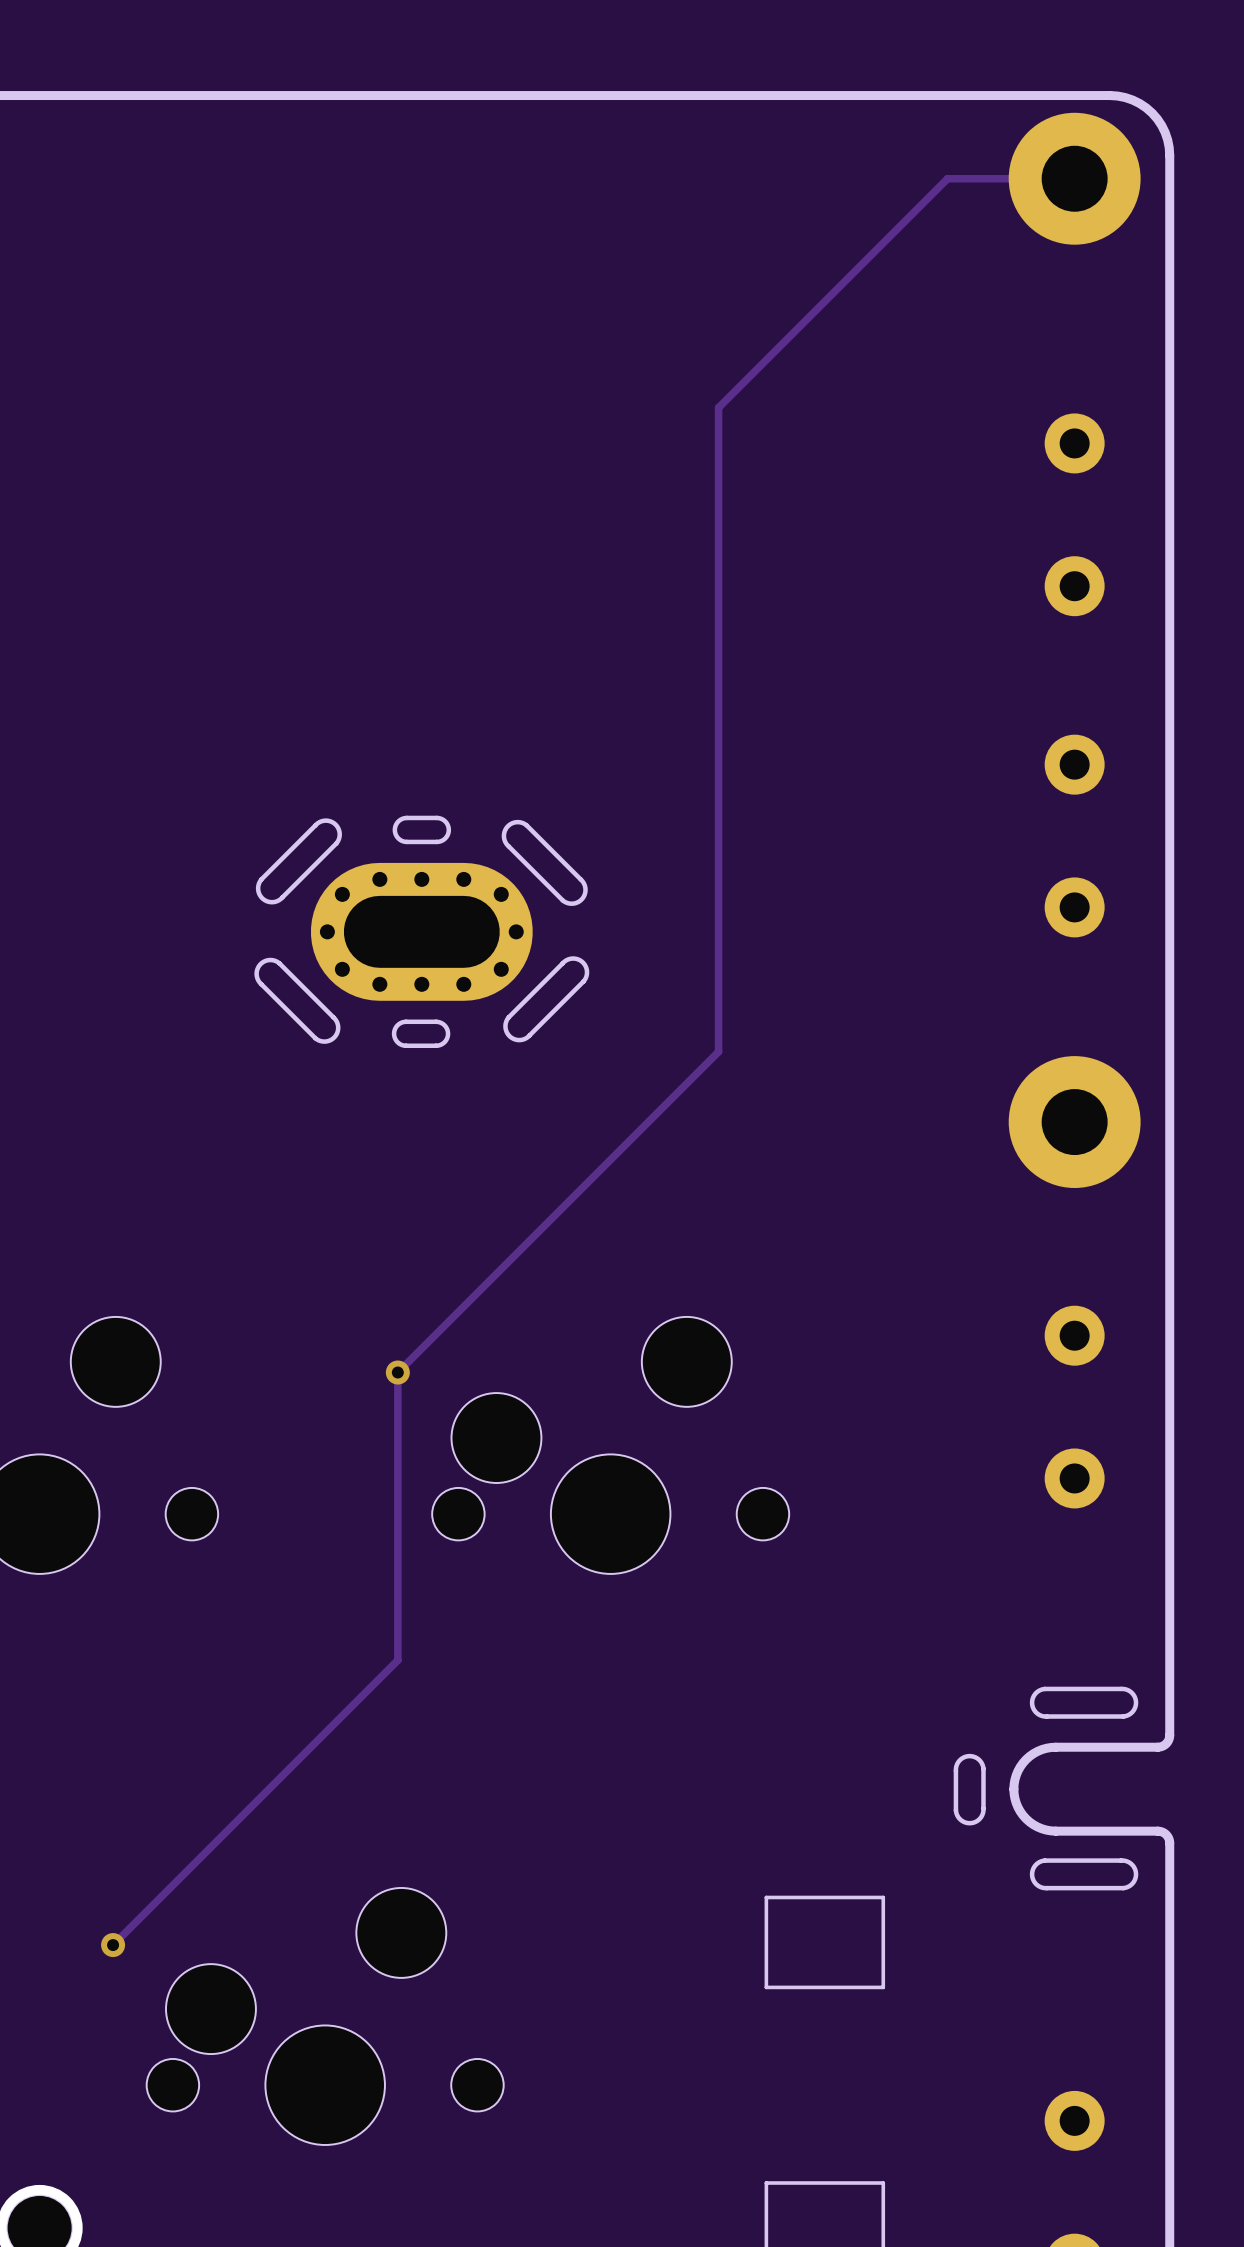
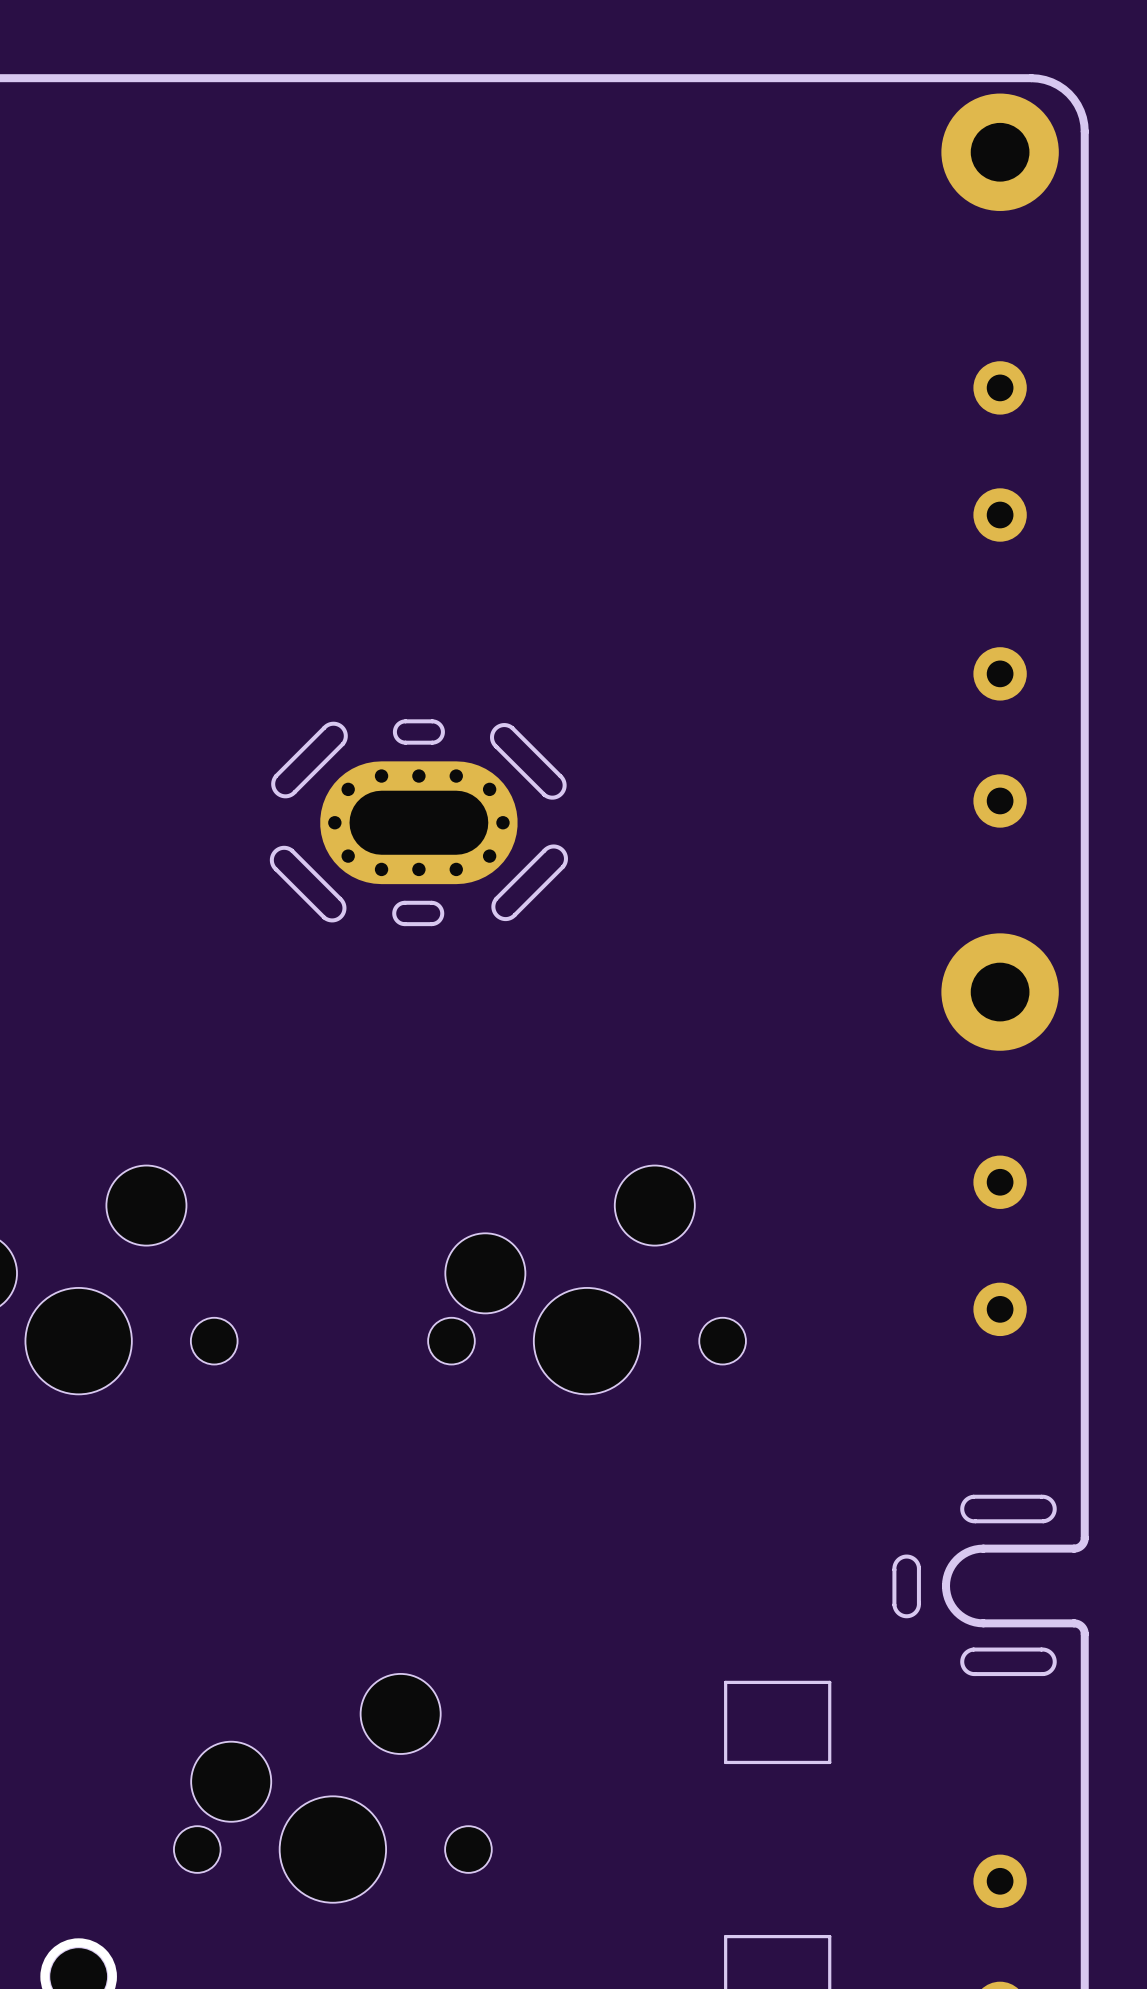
track: (1074, 178) (947, 178) (718, 407) (718, 1051) (397, 1372) (397, 1660) (113, 1945) -> none
via: (397, 1372) -> none
via: (113, 1945) -> none

